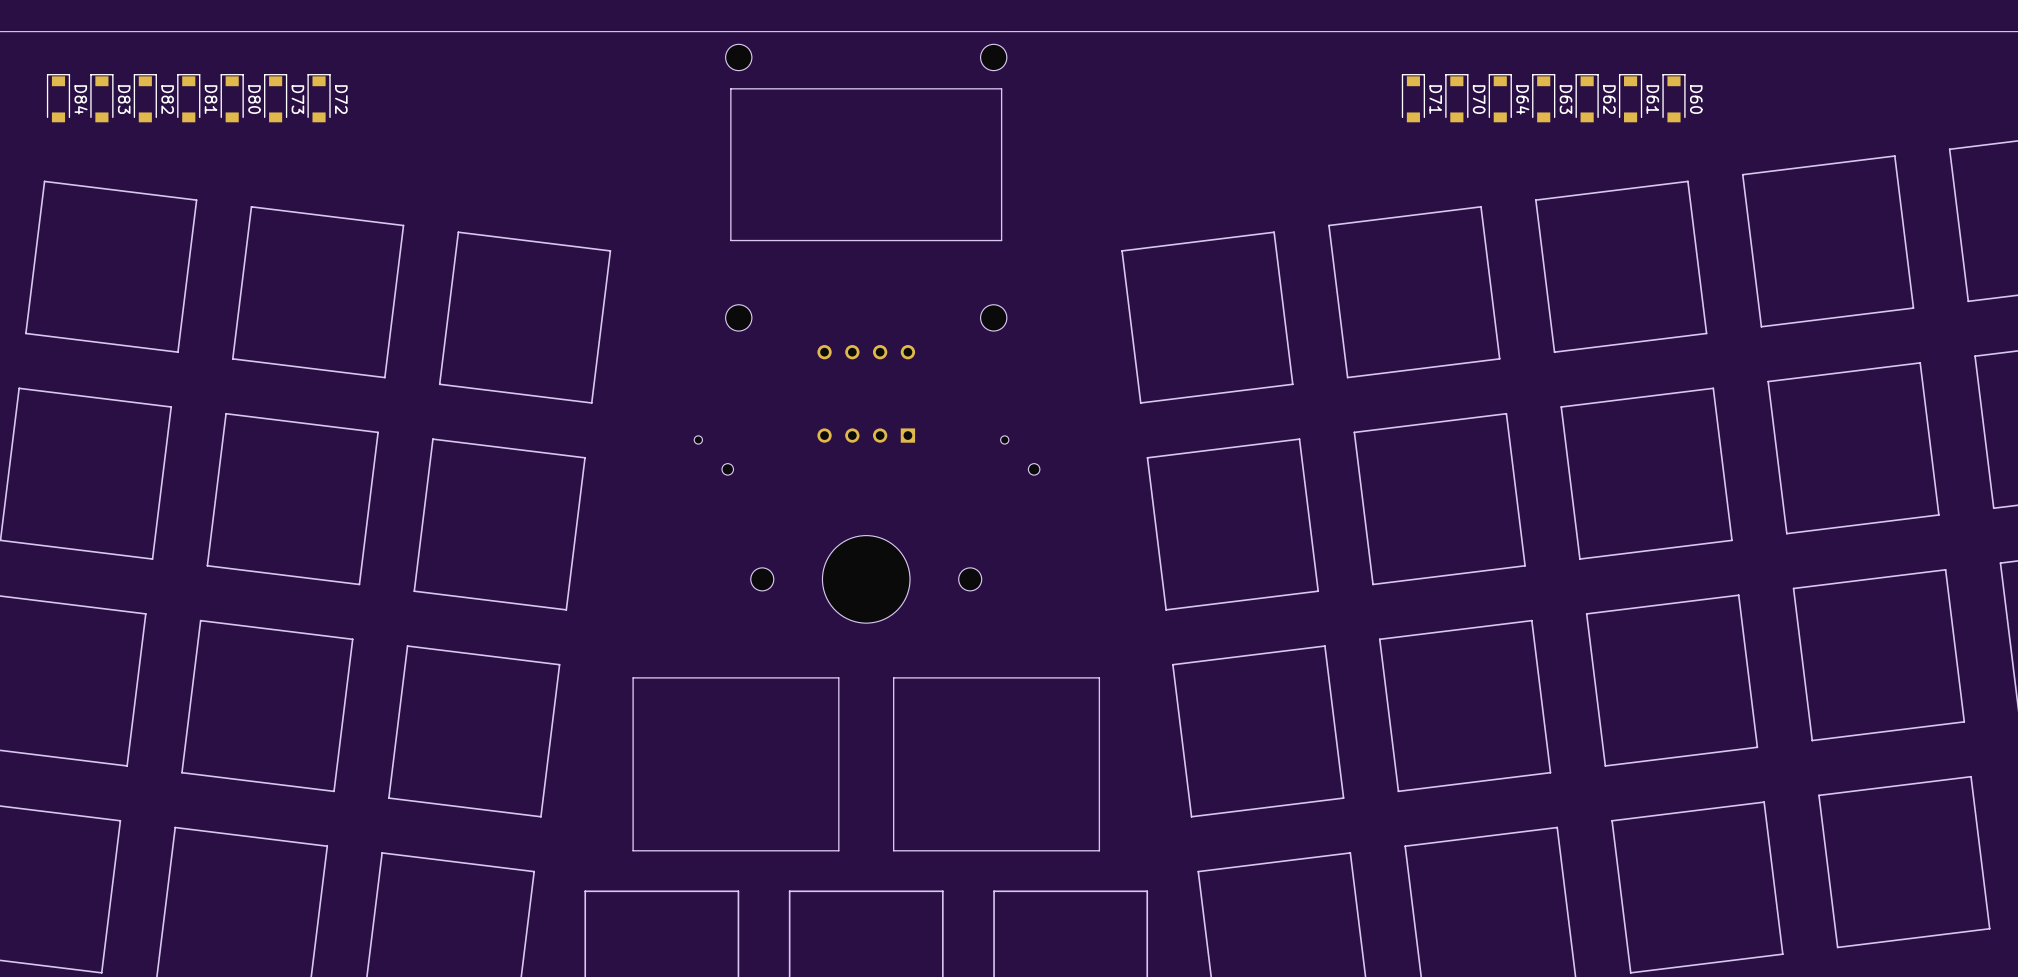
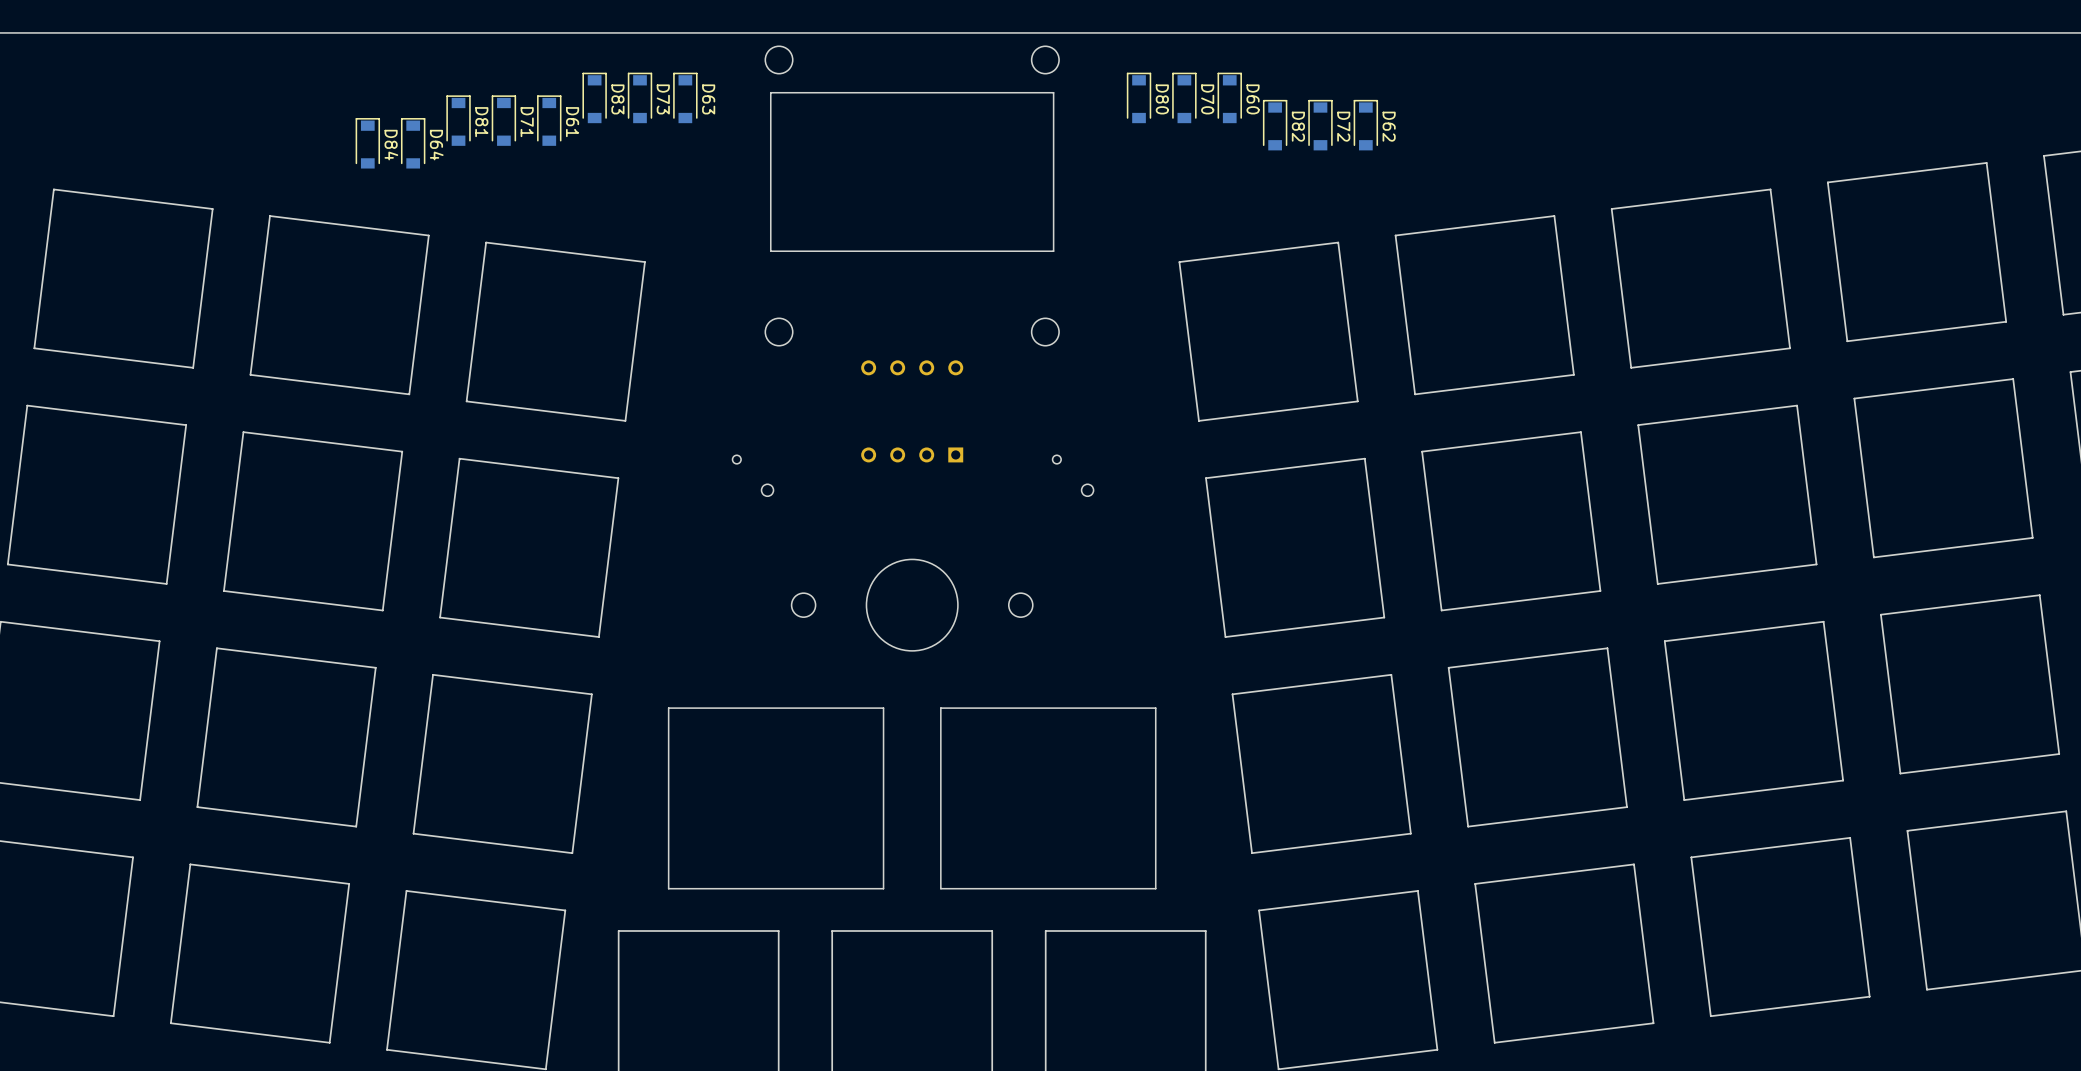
D84 position: (58, 98) -> (367, 143)
D83 position: (101, 98) -> (594, 97)
D82 position: (145, 98) -> (1275, 125)
D81 position: (188, 98) -> (458, 120)
D80 position: (232, 98) -> (1139, 97)
D73 position: (275, 98) -> (640, 97)
D72 position: (319, 98) -> (1320, 125)
D71 position: (1413, 98) -> (503, 120)
D70 position: (1456, 98) -> (1184, 97)
D64 position: (1500, 98) -> (413, 143)
D63 position: (1543, 98) -> (685, 97)
D62 position: (1587, 98) -> (1365, 125)
D61 position: (1630, 98) -> (549, 120)
D60 position: (1673, 98) -> (1229, 97)

